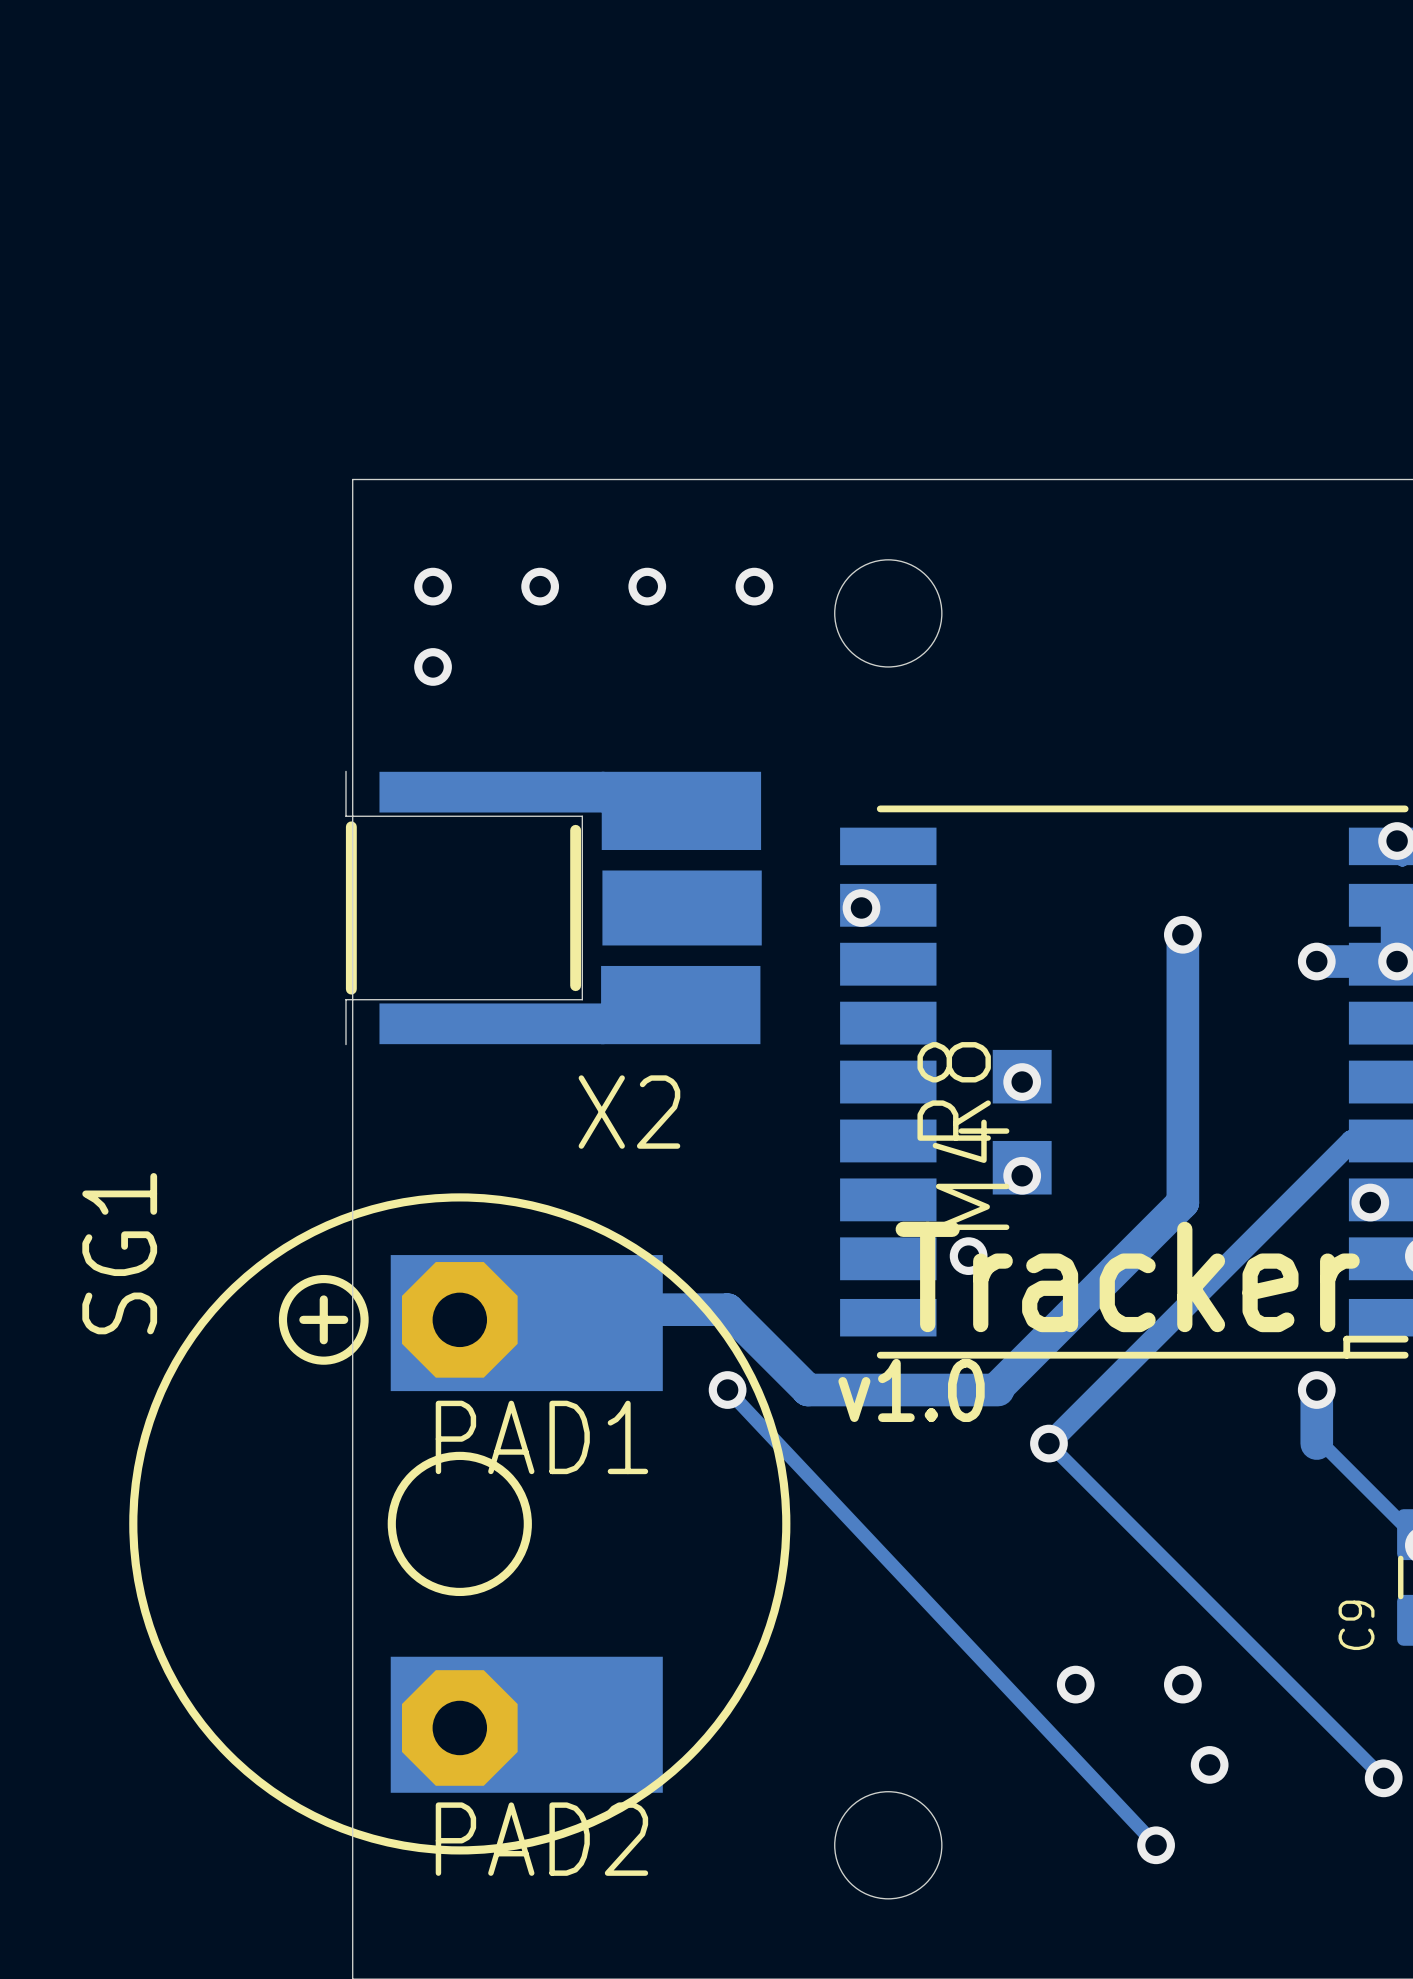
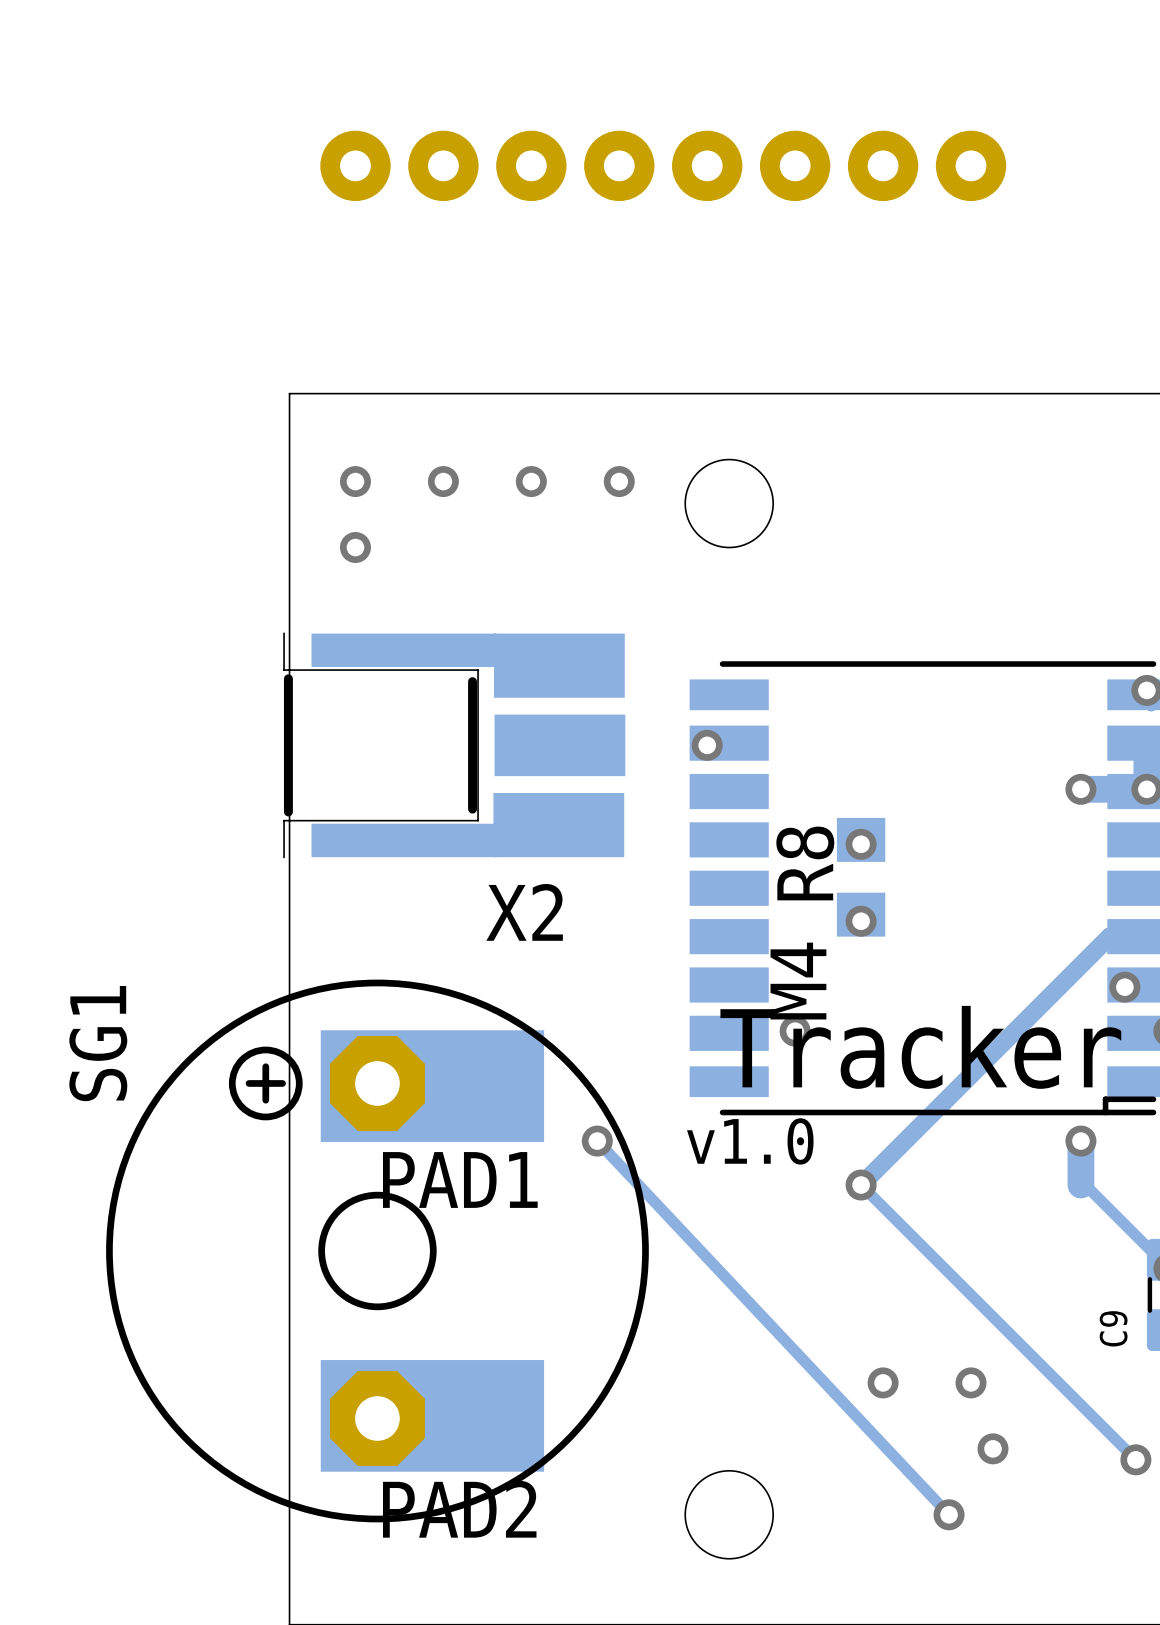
part: none -> (663, 165)
track: (1182, 934) (1182, 1202) (998, 1387) (998, 1390) (807, 1390) (727, 1309) (486, 1309) (469, 1293) (459, 1319) -> none
via: (1182, 934) -> none
via: none -> (861, 844)
via: (1022, 1082) -> none
R8 position: (1022, 1122) -> (861, 877)
via: none -> (861, 921)
via: (1022, 1175) -> none

